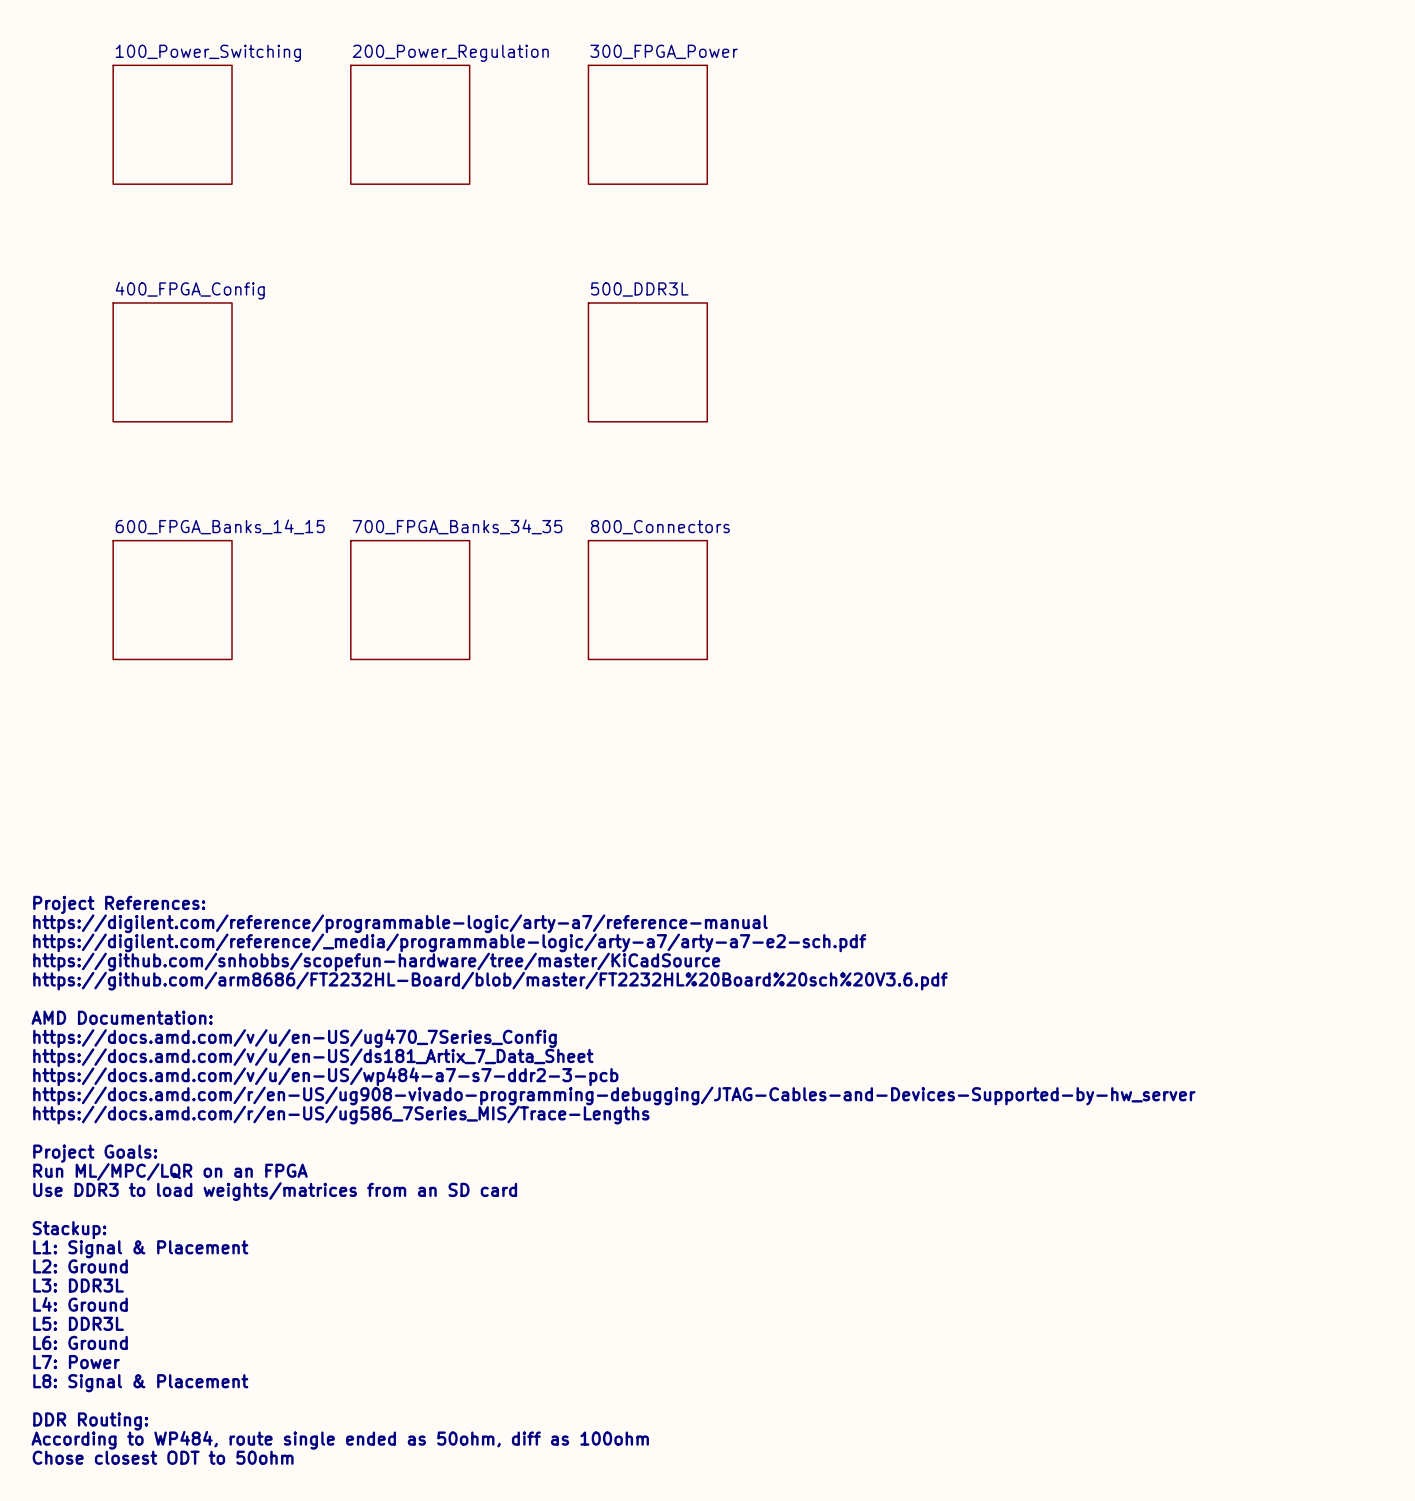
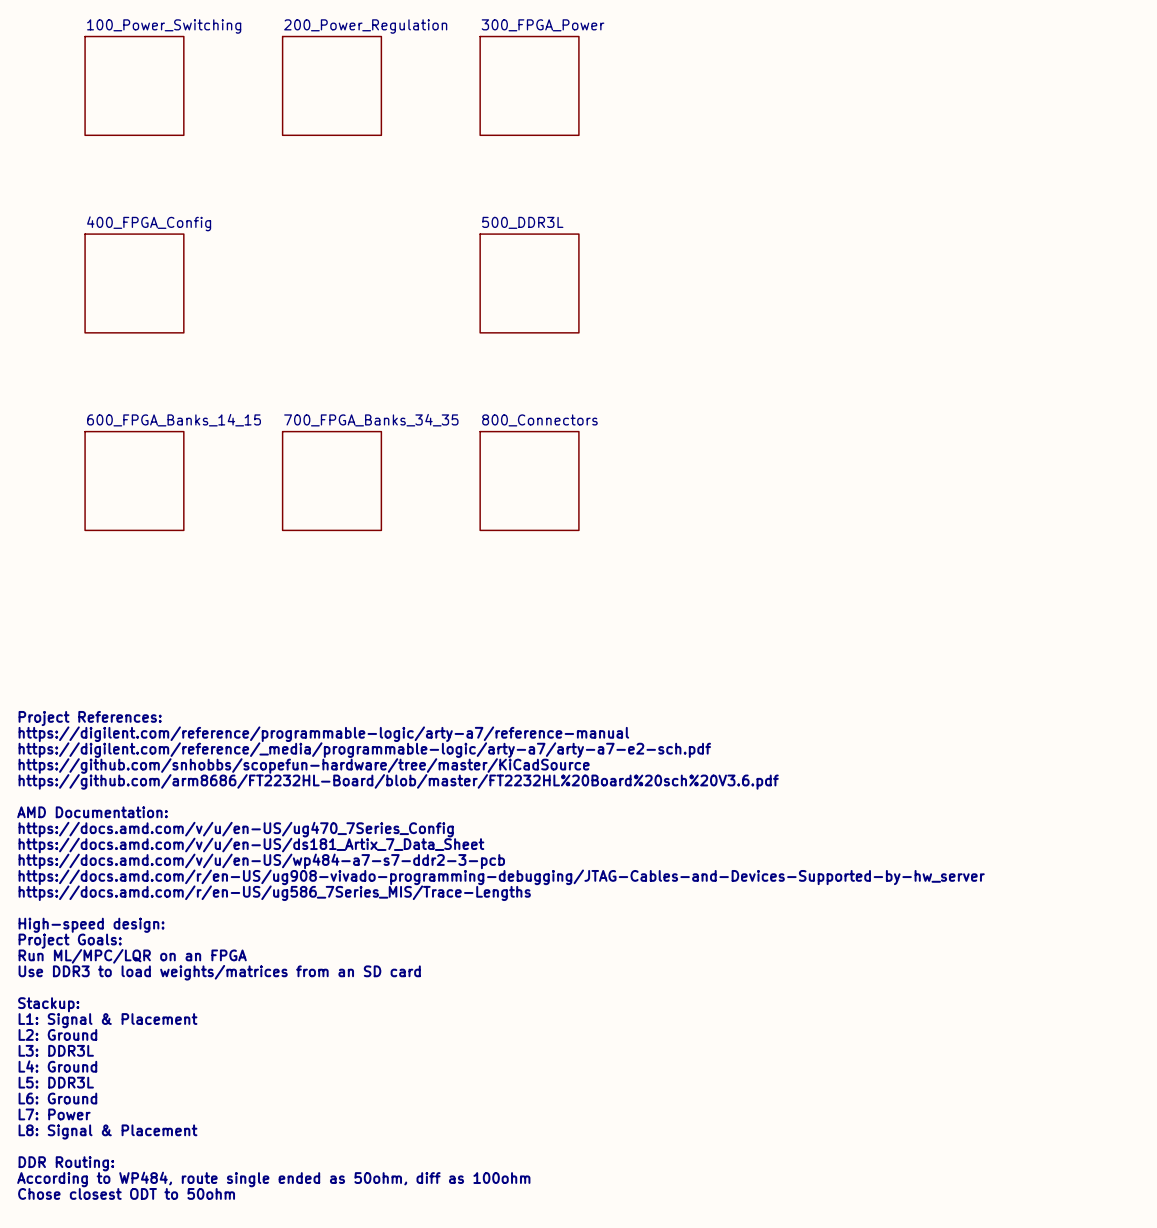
text: none -> Project References: (90, 718)
text: Project References: (119, 904) -> https://digilent.com/reference/programmable-logic/arty-a7/reference-manual (323, 734)
text: https://digilent.com/reference/programmable-logic/arty-a7/reference-manual (400, 923) -> https://digilent.com/reference/_media/programmable-logic/arty-a7/arty-a7-e2-sch.pdf (364, 750)
text: https://digilent.com/reference/_media/programmable-logic/arty-a7/arty-a7-e2-sch.pdf (449, 942) -> https://github.com/snhobbs/scopefun-hardware/tree/master/KiCadSource (304, 766)
text: https://github.com/snhobbs/scopefun-hardware/tree/master/KiCadSource (376, 962) -> https://github.com/arm8686/FT2232HL-Board/blob/master/FT2232HL%20Board%20sch%20V3.6.pdf (398, 781)
text: https://github.com/arm8686/FT2232HL-Board/blob/master/FT2232HL%20Board%20sch%20V3.6.pdf (490, 981) -> none
text: none -> AMD Documentation: (92, 812)
text: AMD Documentation: (122, 1017) -> https://docs.amd.com/v/u/en-US/ug470_7Series_Config (236, 829)
text: https://docs.amd.com/v/u/en-US/ug470_7Series_Config (294, 1038) -> https://docs.amd.com/v/u/en-US/ds181_Artix_7_Data_Sheet (251, 845)
text: https://docs.amd.com/v/u/en-US/ds181_Artix_7_Data_Sheet (313, 1057) -> https://docs.amd.com/v/u/en-US/wp484-a7-s7-ddr2-3-pcb (261, 861)
text: https://docs.amd.com/v/u/en-US/wp484-a7-s7-ddr2-3-pcb (325, 1076) -> https://docs.amd.com/r/en-US/ug908-vivado-programming-debugging/JTAG-Cables-and-Devices-Supported-by-hw_server (501, 877)
text: https://docs.amd.com/r/en-US/ug908-vivado-programming-debugging/JTAG-Cables-and-Devices-Supported-by-hw_server (614, 1095) -> https://docs.amd.com/r/en-US/ug586_7Series_MIS/Trace-Lengths (274, 893)
text: https://docs.amd.com/r/en-US/ug586_7Series_MIS/Trace-Lengths (341, 1115) -> none
text: none -> High-speed design: (91, 925)

